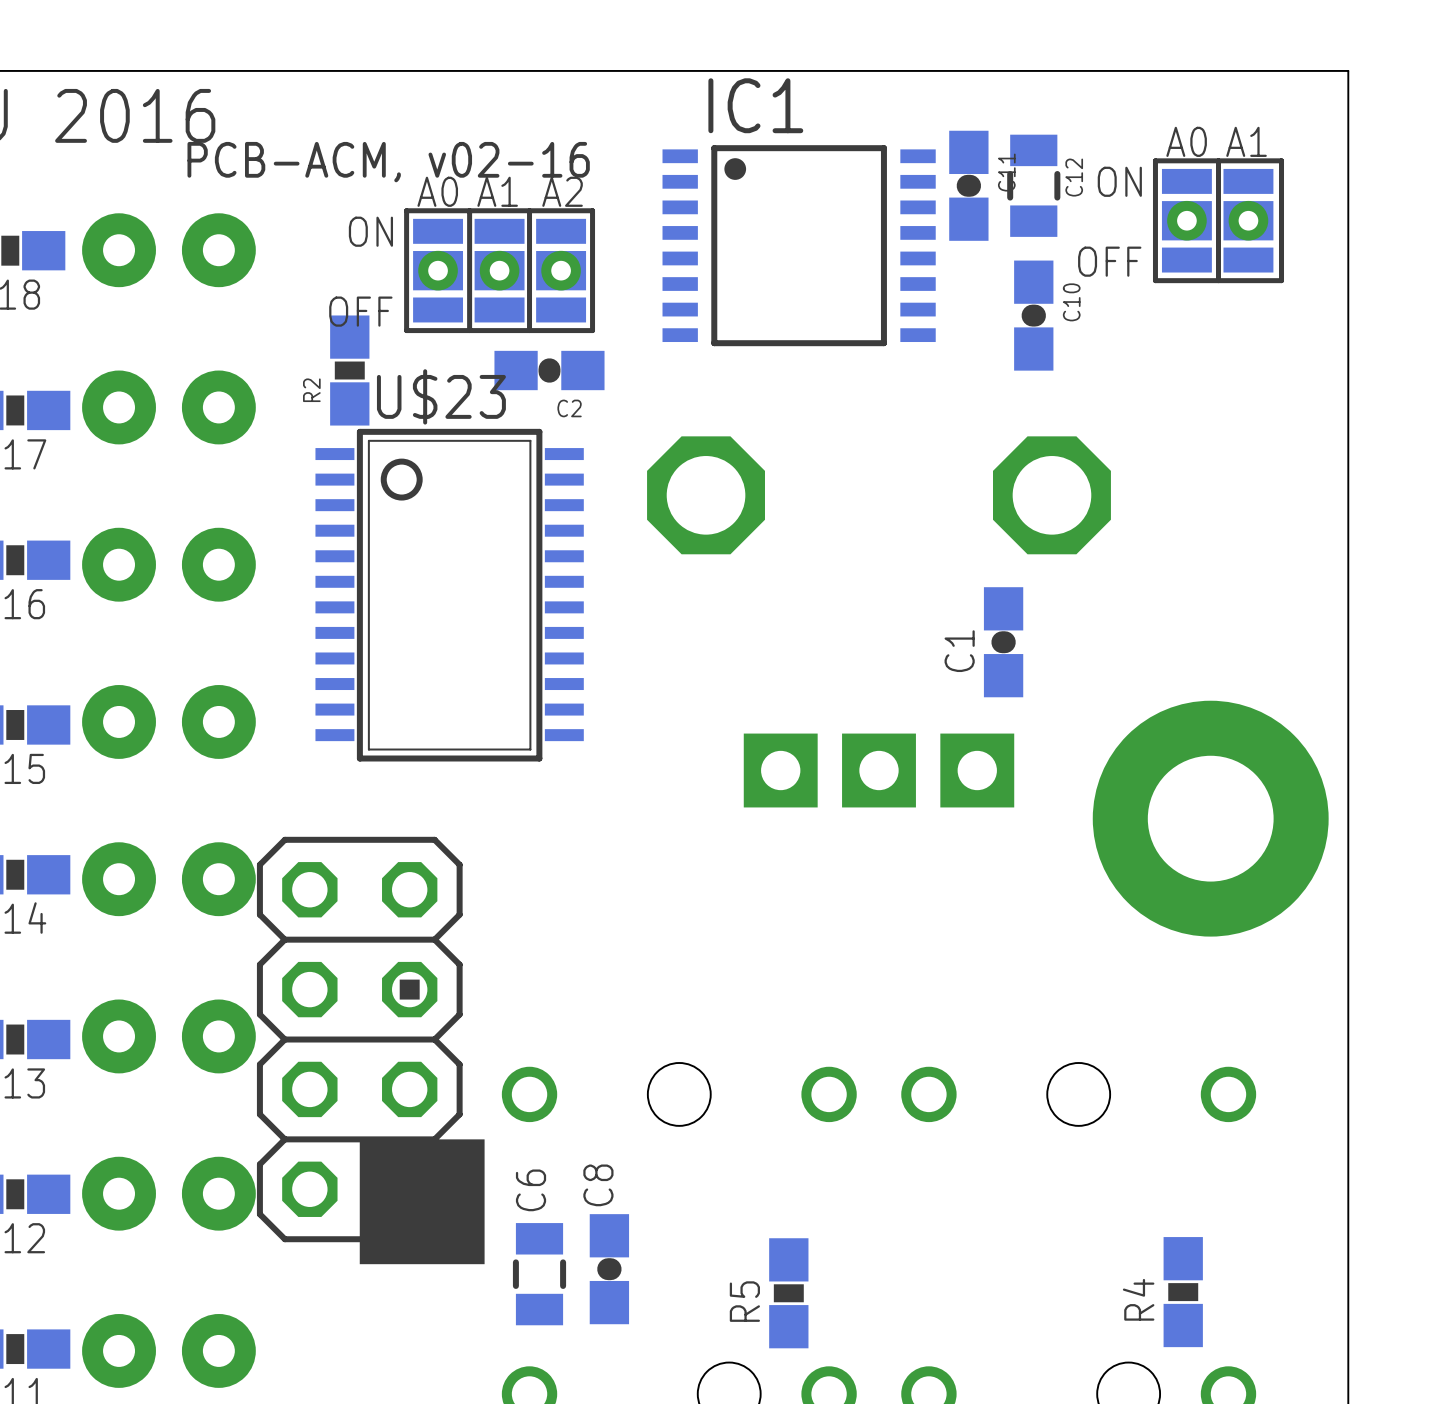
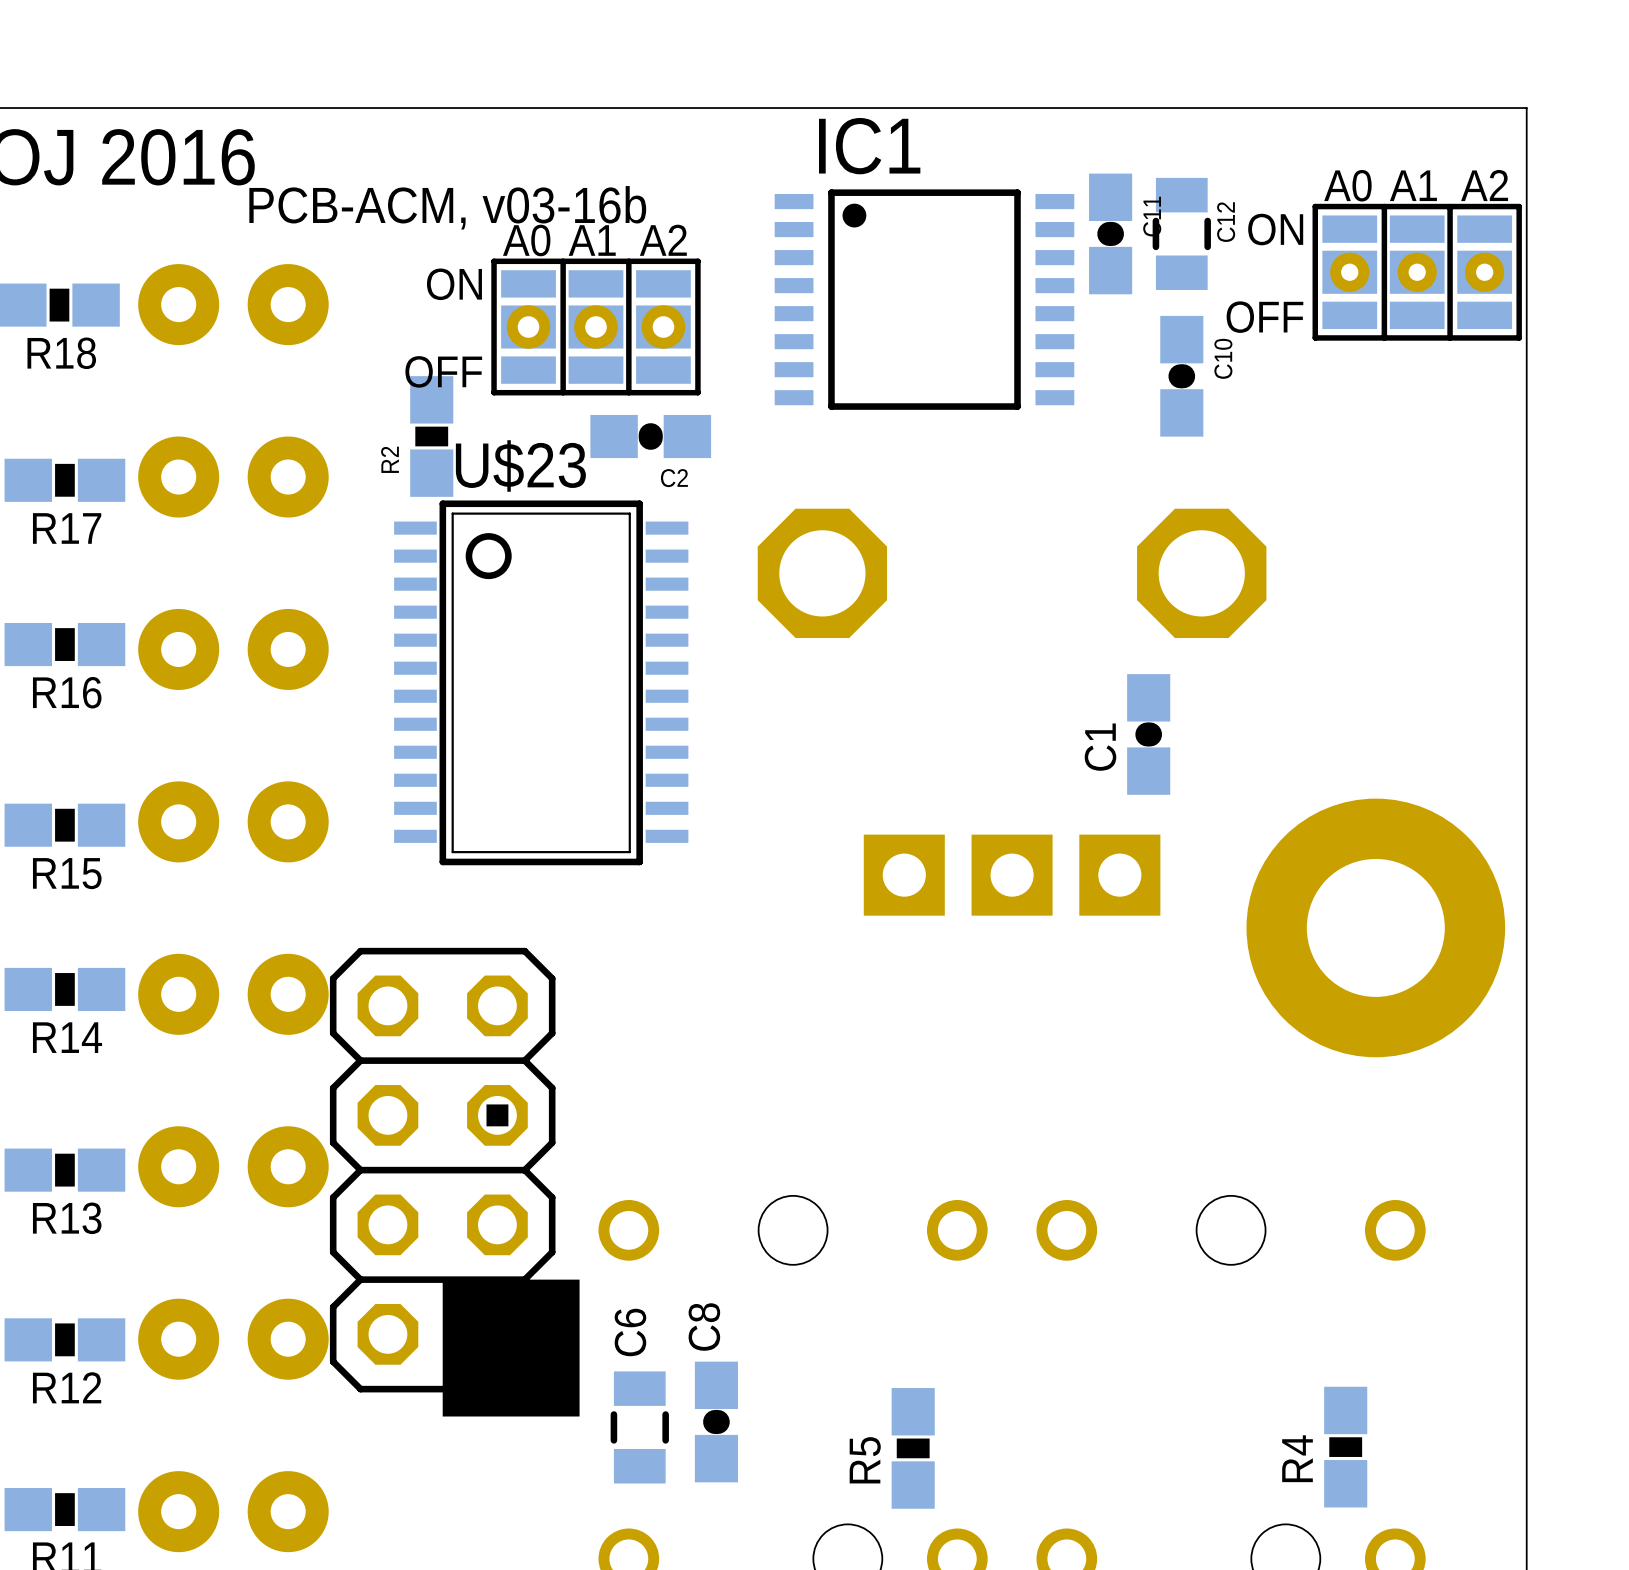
part footprint: [1152, 158, 1285, 284] -> [1312, 203, 1522, 341]
text: PCB-ACM, v02-16 (388, 162) -> PCB-ACM, v03-16b (447, 207)

